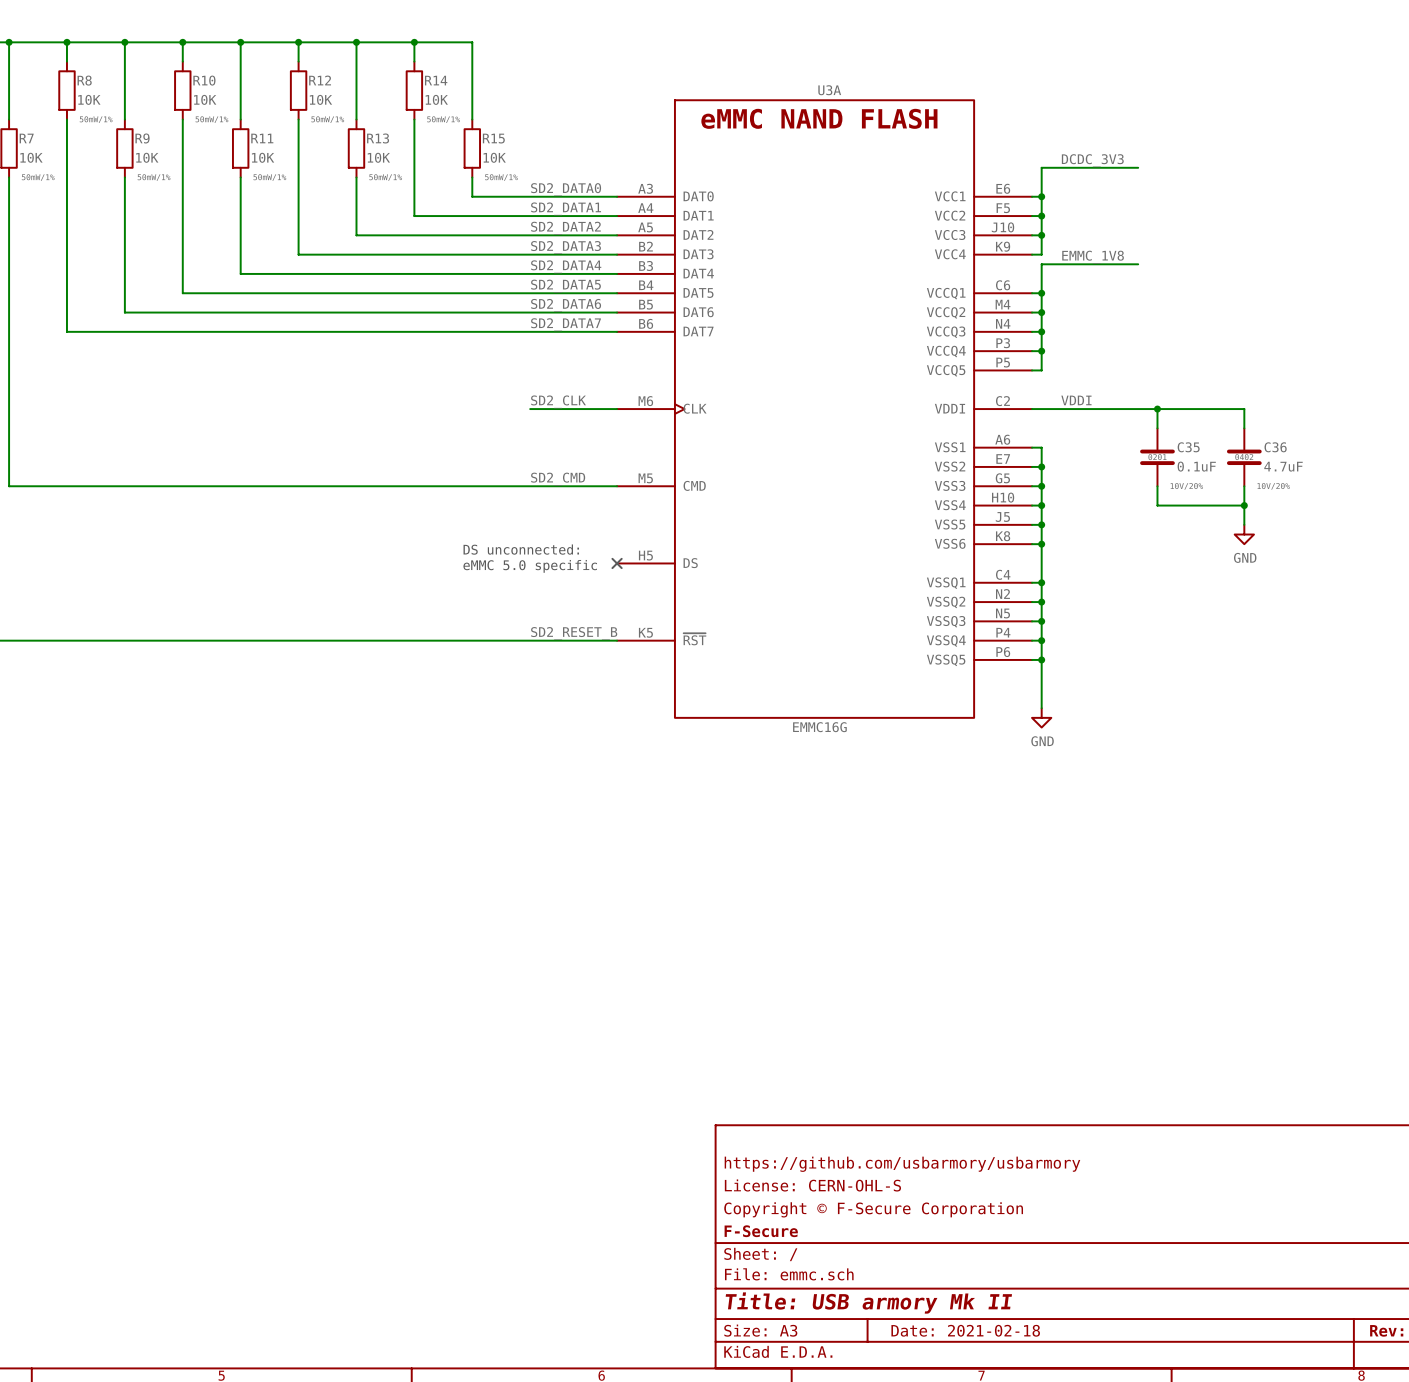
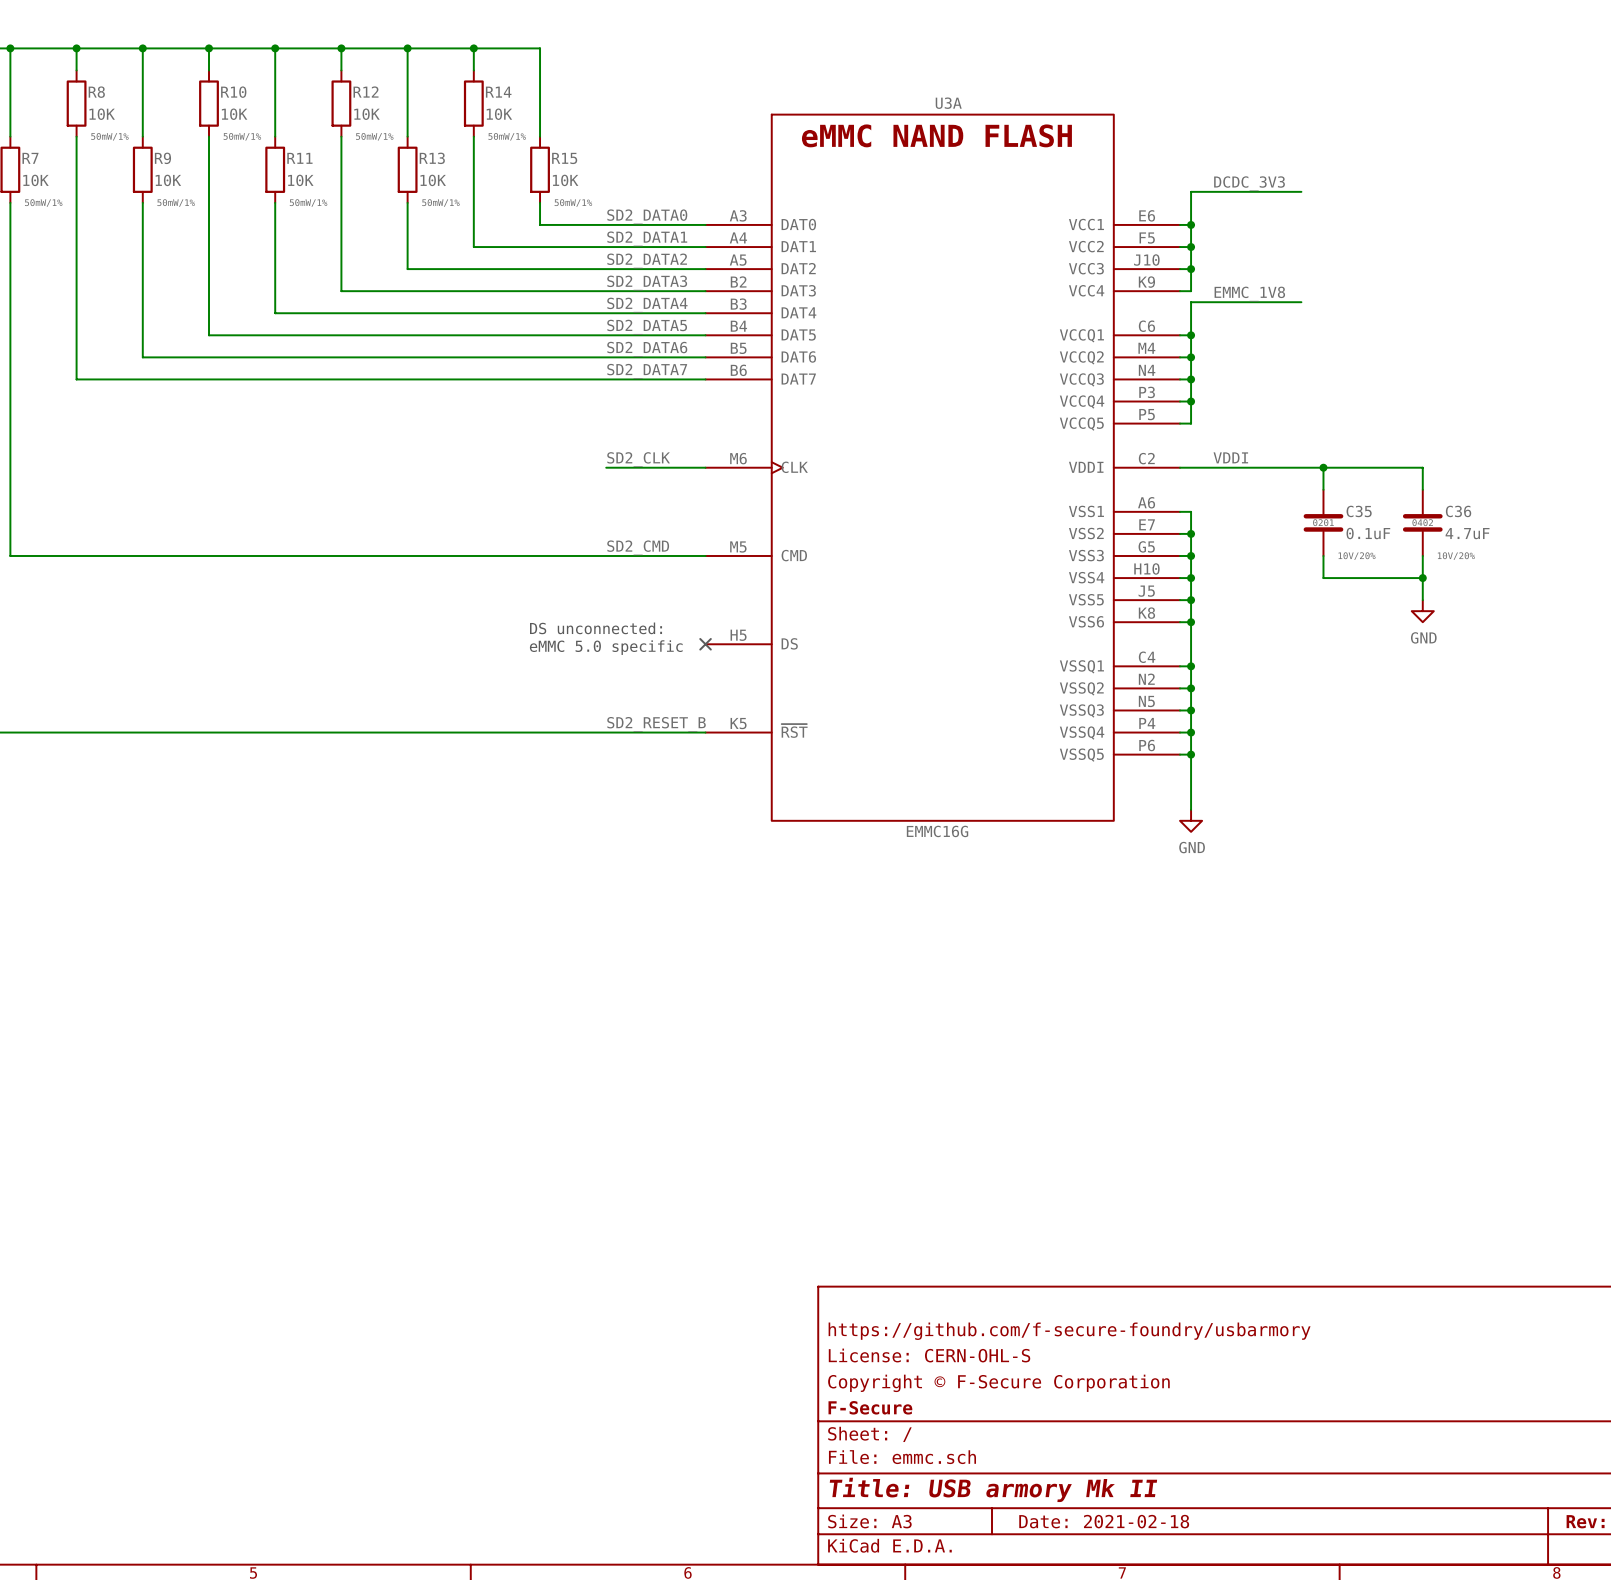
title block: https://github.com/usbarmory/usbarmory (902, 1164) -> https://github.com/f-secure-foundry/usbarmory (1069, 1331)

